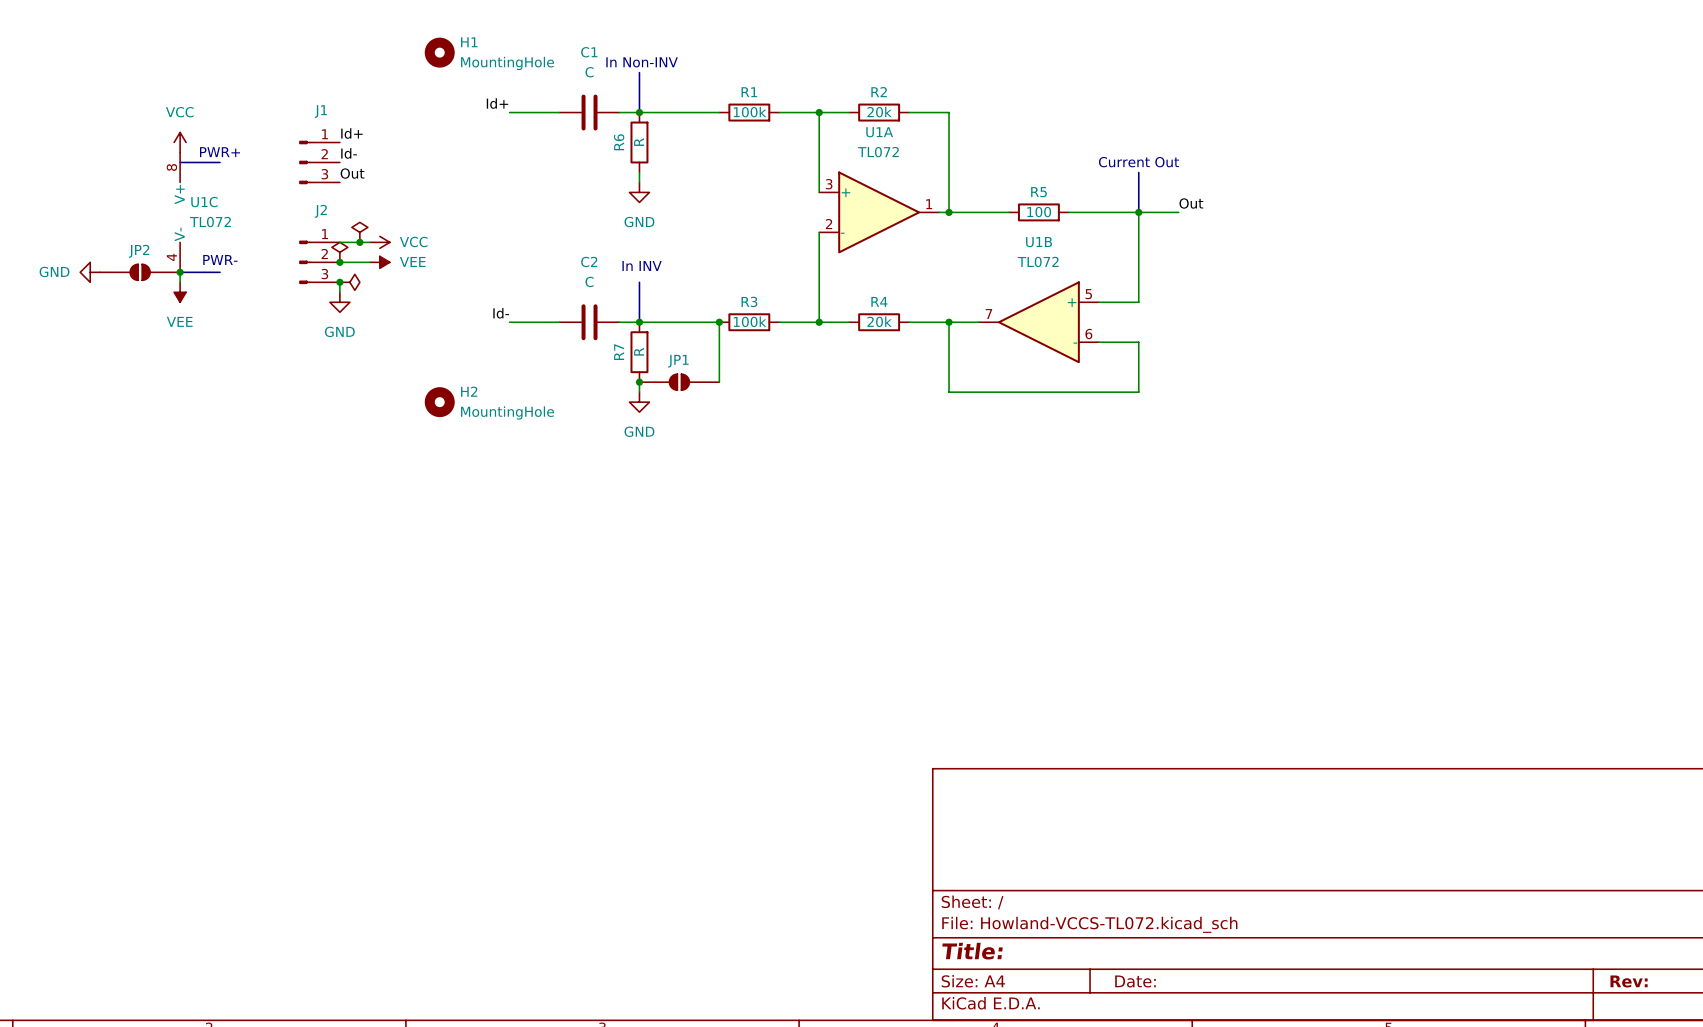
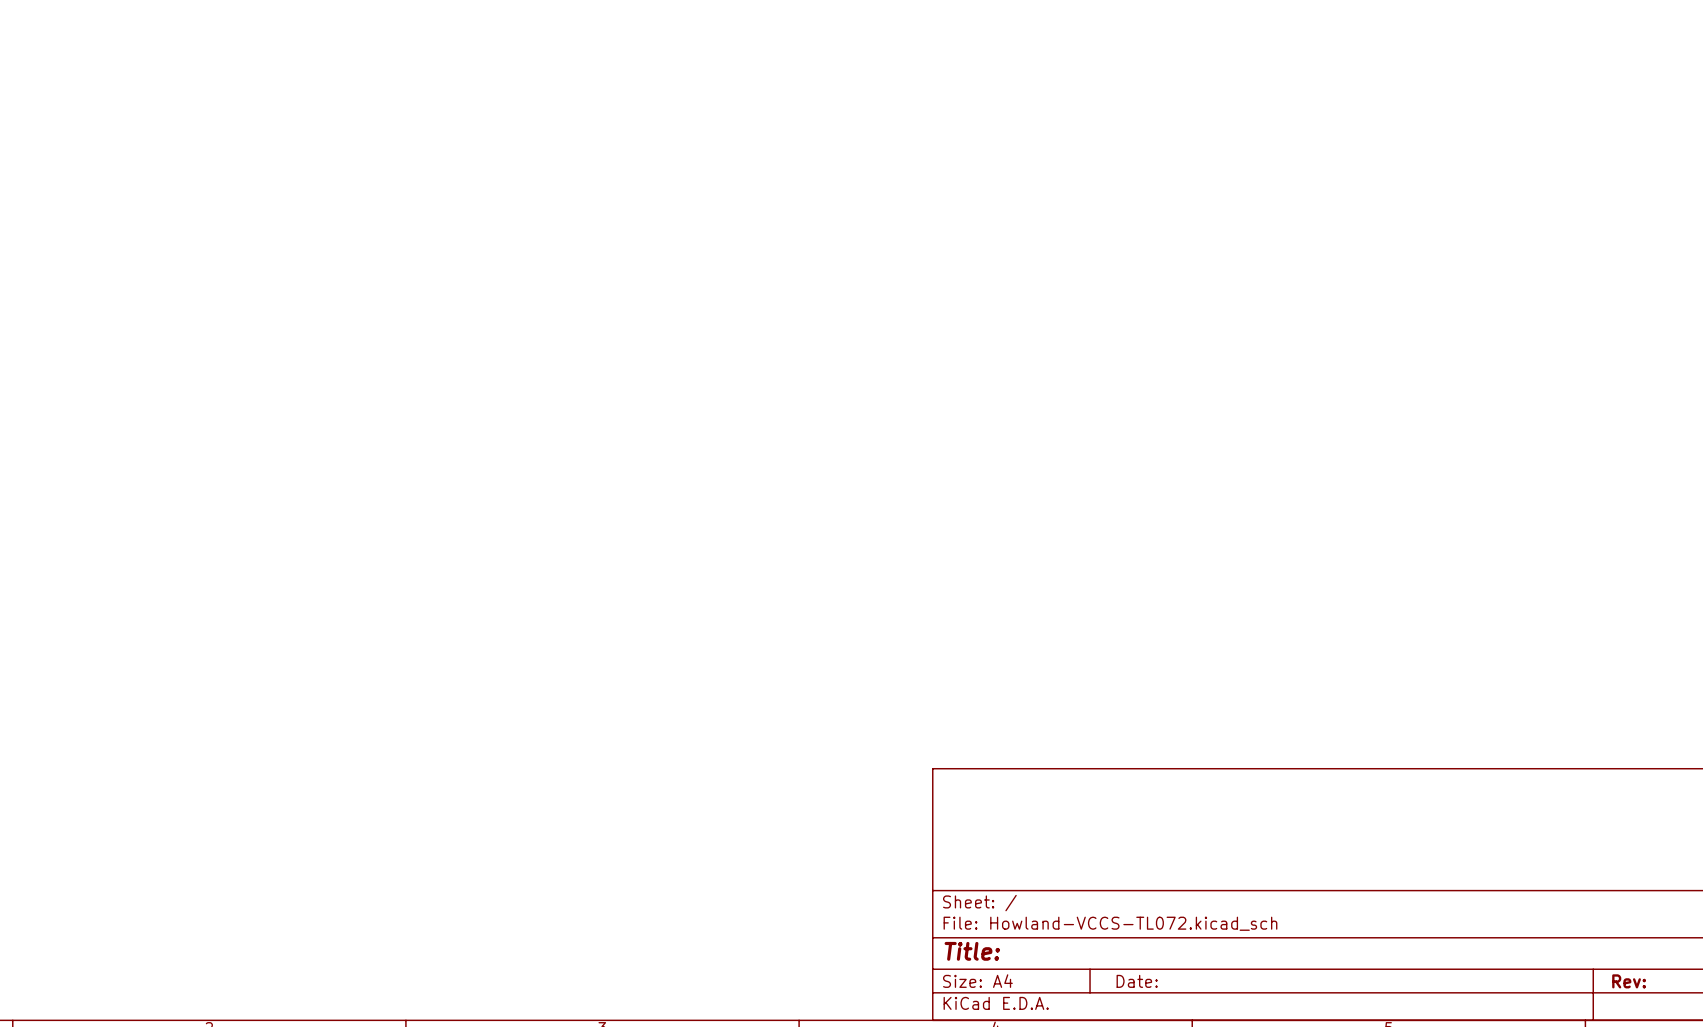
H1: MountingHole (439, 52) -> none
text: In Non-INV (642, 62) -> none
line: (639, 72) (639, 112) -> none
label: Id+ (497, 103) -> none
wire: (509, 112) (559, 112) -> none
C1: C (589, 112) -> none
wire: (619, 112) (719, 112) -> none
junction: (639, 112) -> none
R1: 100k (749, 112) -> none
wire: (779, 112) (849, 112) -> none
wire: (819, 112) (819, 192) -> none
junction: (819, 112) -> none
R2: 20k (879, 112) -> none
wire: (909, 112) (949, 112) (949, 212) -> none
label: Id+ (351, 133) -> none
power symbol: VCC (180, 142) -> none
R6: R (639, 142) -> none
text: PWR+ (219, 152) -> none
label: Id- (349, 153) -> none
line: (180, 162) (220, 162) -> none
J1: (319, 162) -> none
text: Current Out (1138, 162) -> none
wire: (639, 172) (639, 182) -> none
line: (1138, 172) (1138, 212) -> none
label: Out (352, 173) -> none
power symbol: GND (639, 192) -> none
label: Out (1191, 203) -> none
U1C: TL072 (180, 212) -> none
U1A: TL072 (879, 212) -> none
wire: (939, 212) (1008, 212) -> none
junction: (949, 212) -> none
R5: 100 (1038, 212) -> none
wire: (1068, 212) (1178, 212) -> none
wire: (1138, 212) (1138, 302) (1098, 302) -> none
junction: (1138, 212) -> none
power symbol: (359, 232) -> none
wire: (819, 232) (819, 322) -> none
wire: (339, 242) (369, 242) -> none
junction: (359, 242) -> none
power symbol: VCC (379, 242) -> none
power symbol: (339, 252) -> none
text: PWR- (220, 260) -> none
J2: (319, 262) -> none
wire: (339, 262) (369, 262) -> none
junction: (339, 262) -> none
power symbol: VEE (379, 262) -> none
text: In INV (642, 265) -> none
power symbol: GND (90, 272) -> none
JP2: (140, 272) -> none
wire: (180, 272) (180, 282) -> none
line: (180, 272) (220, 272) -> none
junction: (180, 272) -> none
wire: (339, 282) (339, 292) -> none
junction: (339, 282) -> none
power symbol: (349, 282) -> none
line: (639, 282) (639, 322) -> none
power symbol: VEE (180, 292) -> none
power symbol: GND (339, 302) -> none
label: Id- (501, 313) -> none
wire: (509, 322) (559, 322) -> none
C2: C (589, 322) -> none
wire: (619, 322) (719, 322) (719, 382) -> none
junction: (639, 322) -> none
junction: (719, 322) -> none
R3: 100k (749, 322) -> none
wire: (779, 322) (849, 322) -> none
junction: (819, 322) -> none
R4: 20k (879, 322) -> none
wire: (909, 322) (978, 322) -> none
wire: (949, 322) (949, 392) (1138, 392) (1138, 342) (1098, 342) -> none
junction: (949, 322) -> none
U1B: TL072 (1038, 322) -> none
R7: R (639, 352) -> none
wire: (639, 382) (639, 392) -> none
junction: (639, 382) -> none
JP1: (679, 382) -> none
H2: MountingHole (439, 402) -> none
power symbol: GND (639, 402) -> none

